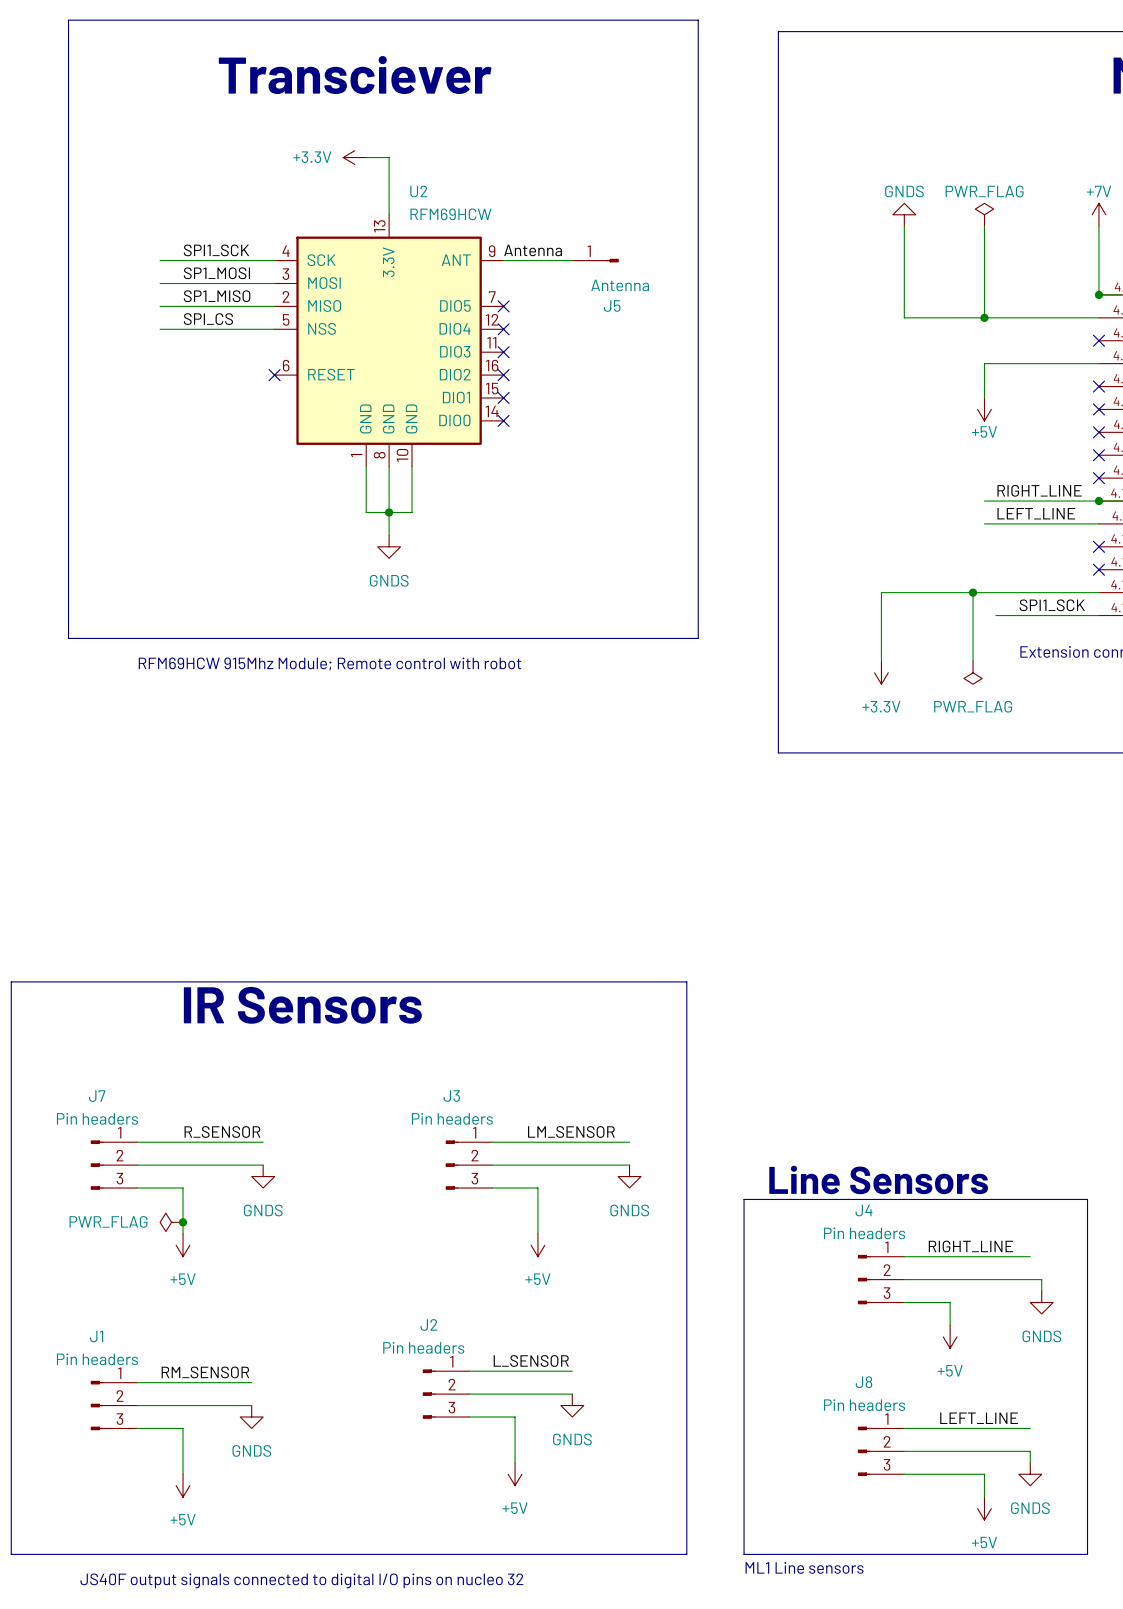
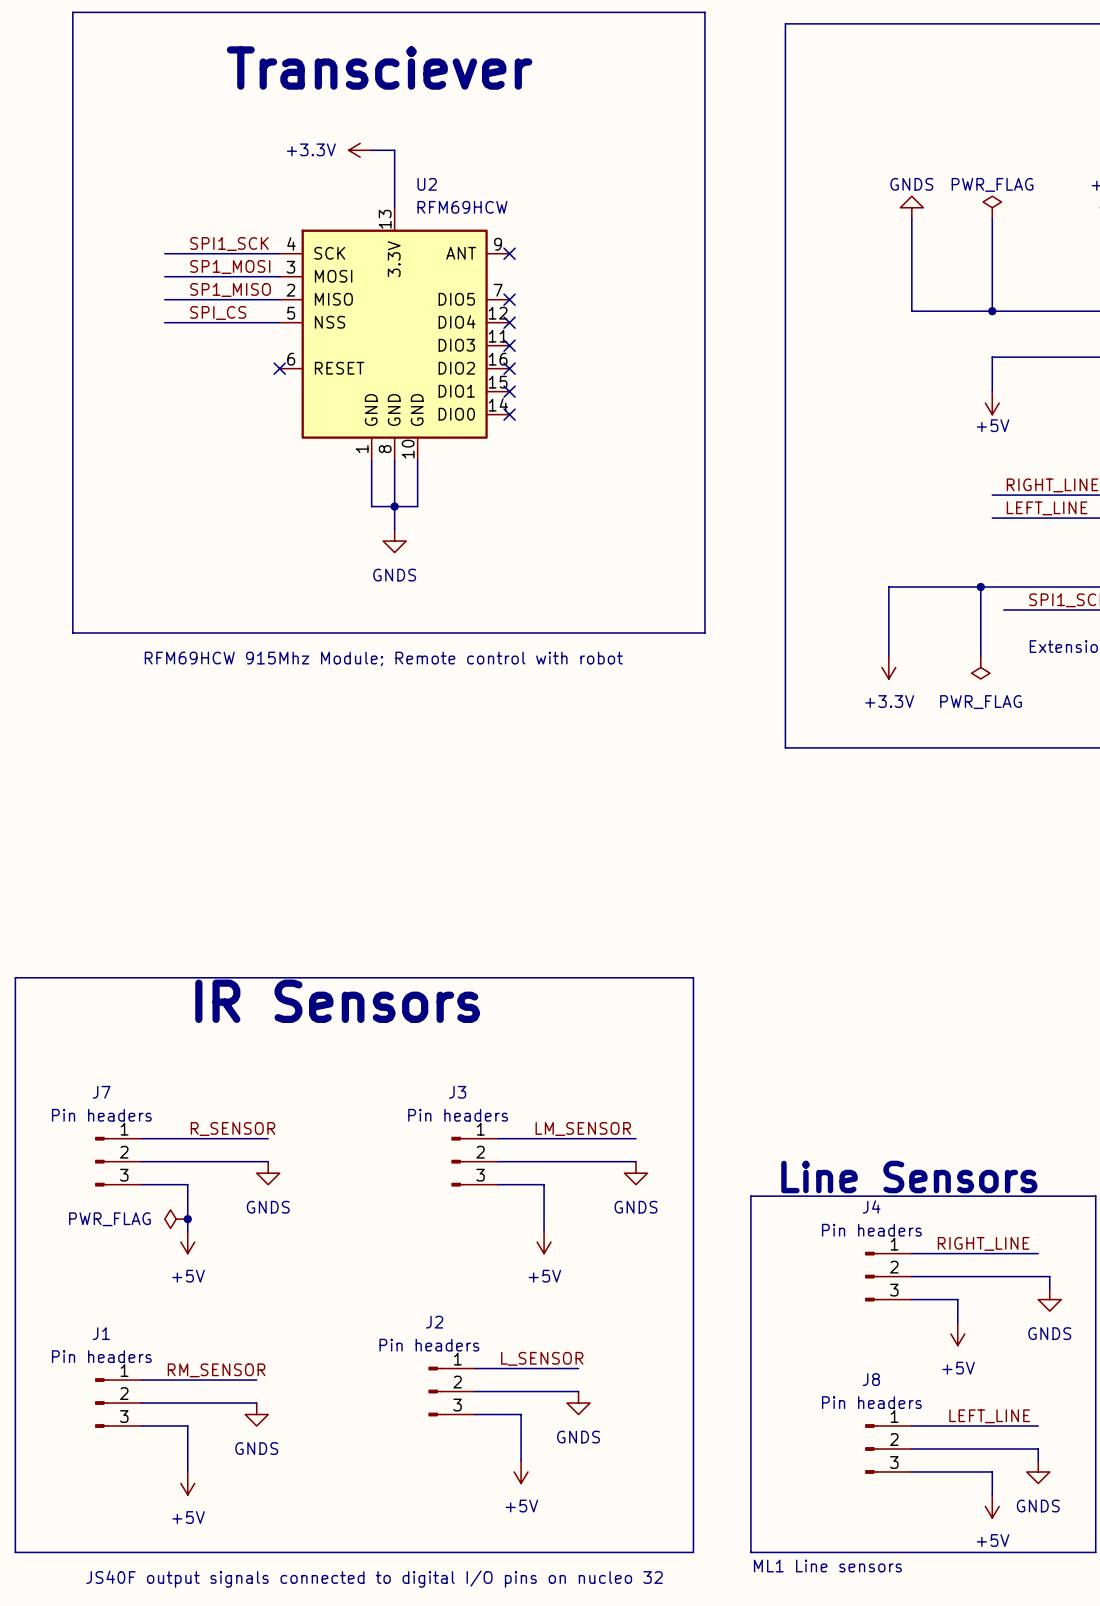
label: Antenna (533, 250) -> none
wire: (503, 260) (572, 260) -> none
no-connect mark: none -> (509, 253)
J5: Antenna (595, 260) -> none

